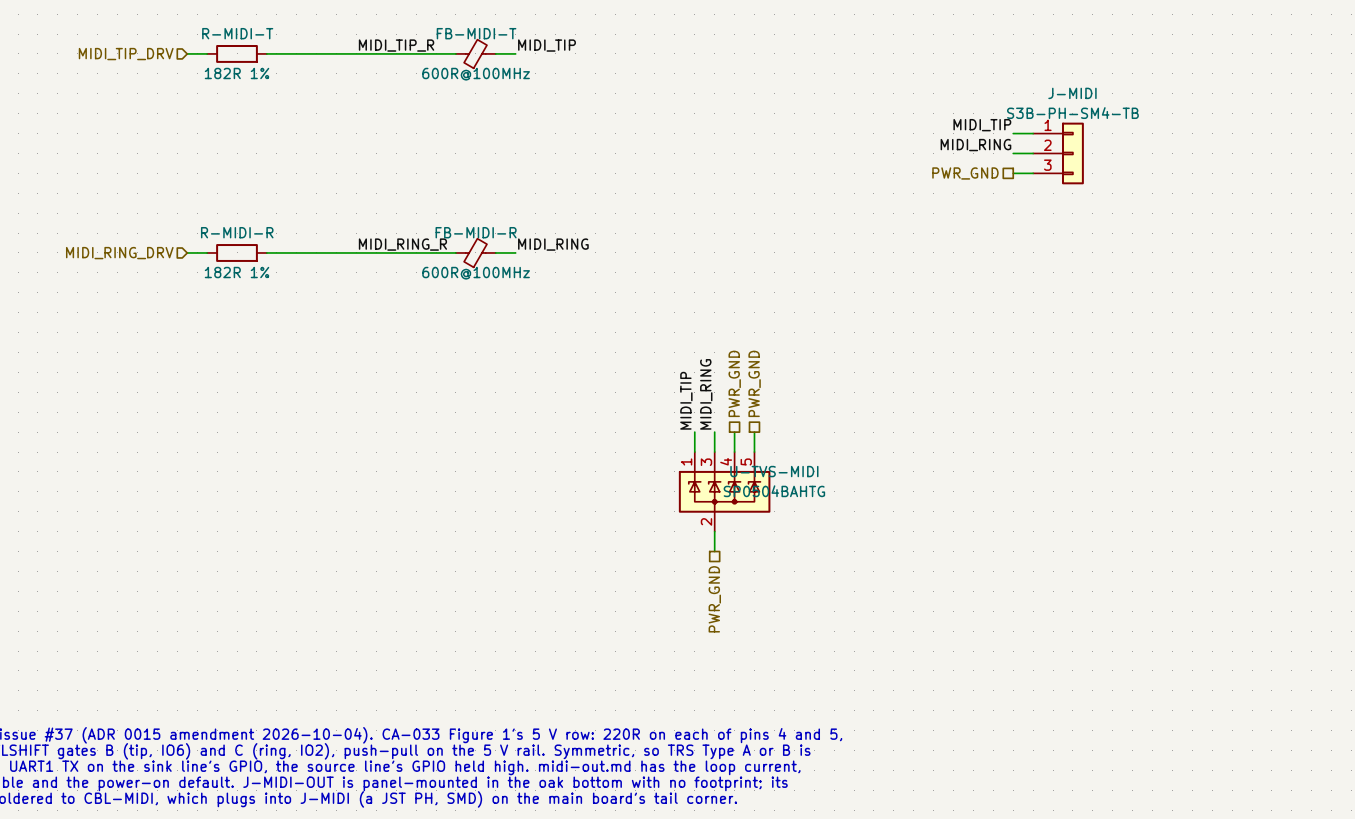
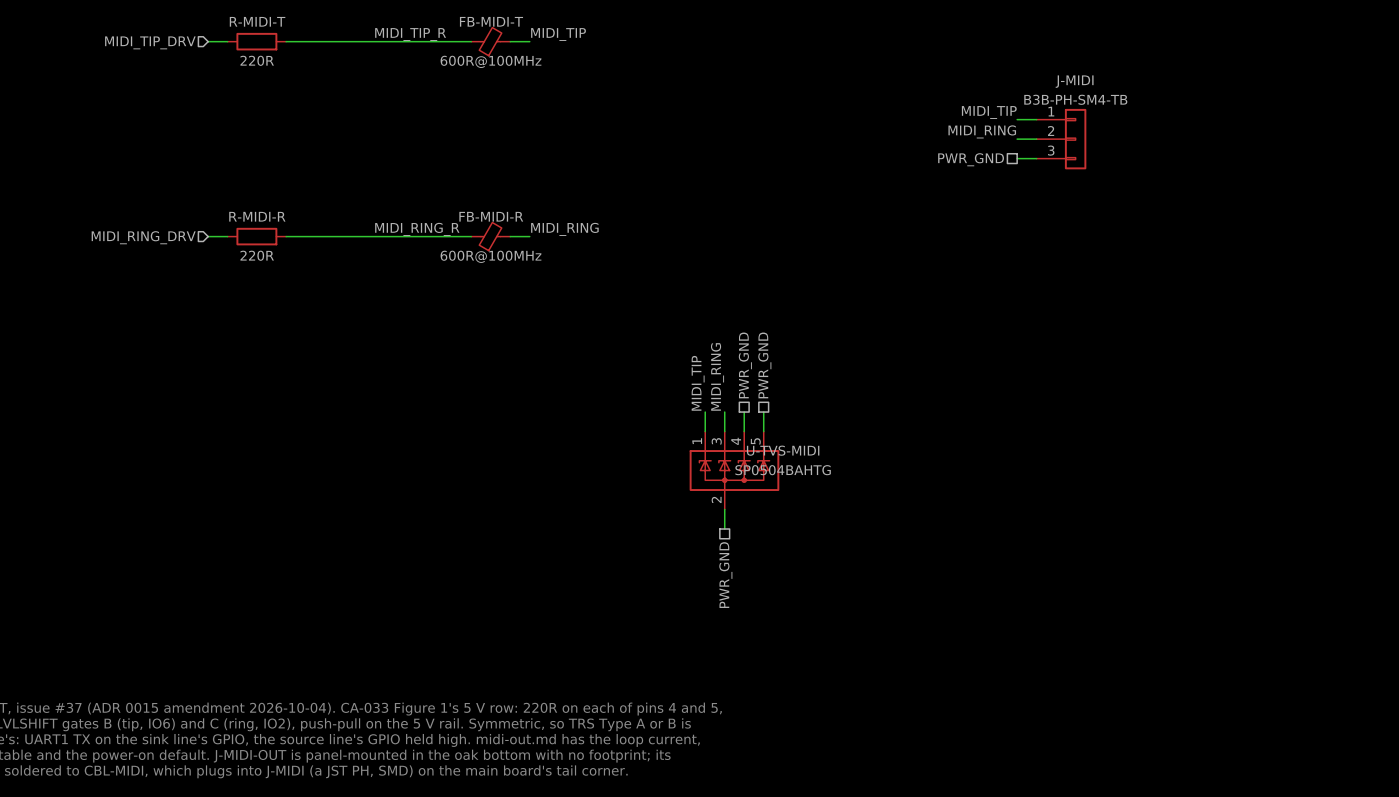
R-MIDI-T value: 182R 1% (237, 73) -> 220R (257, 60)
J-MIDI value: S3B-PH-SM4-TB (1072, 113) -> B3B-PH-SM4-TB (1075, 99)
R-MIDI-R value: 182R 1% (237, 272) -> 220R (257, 255)

